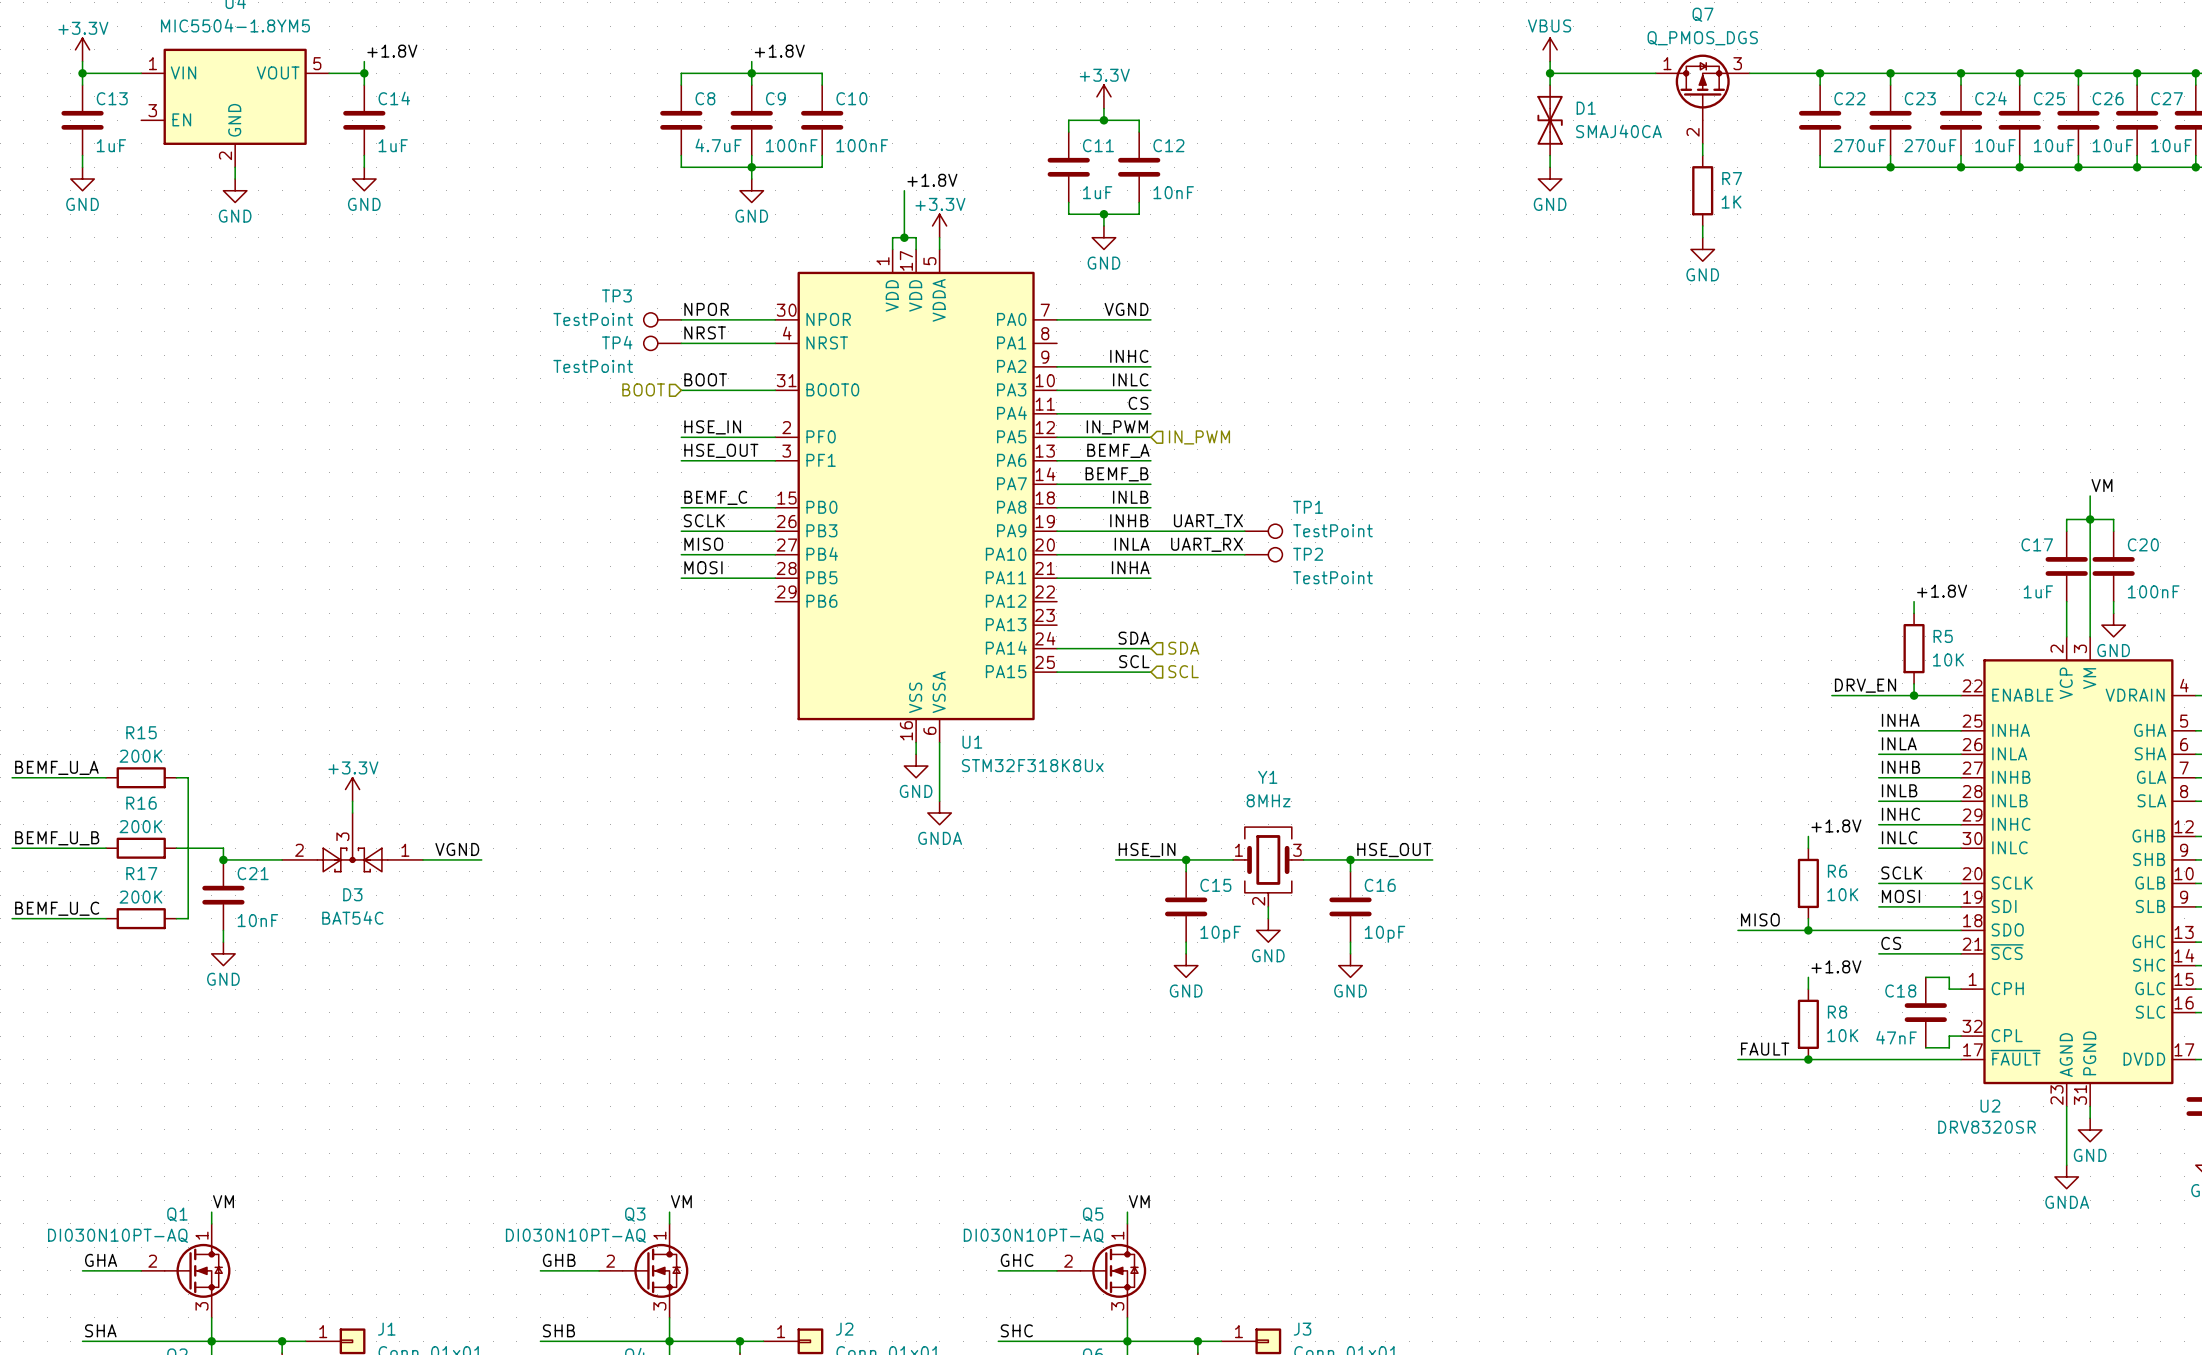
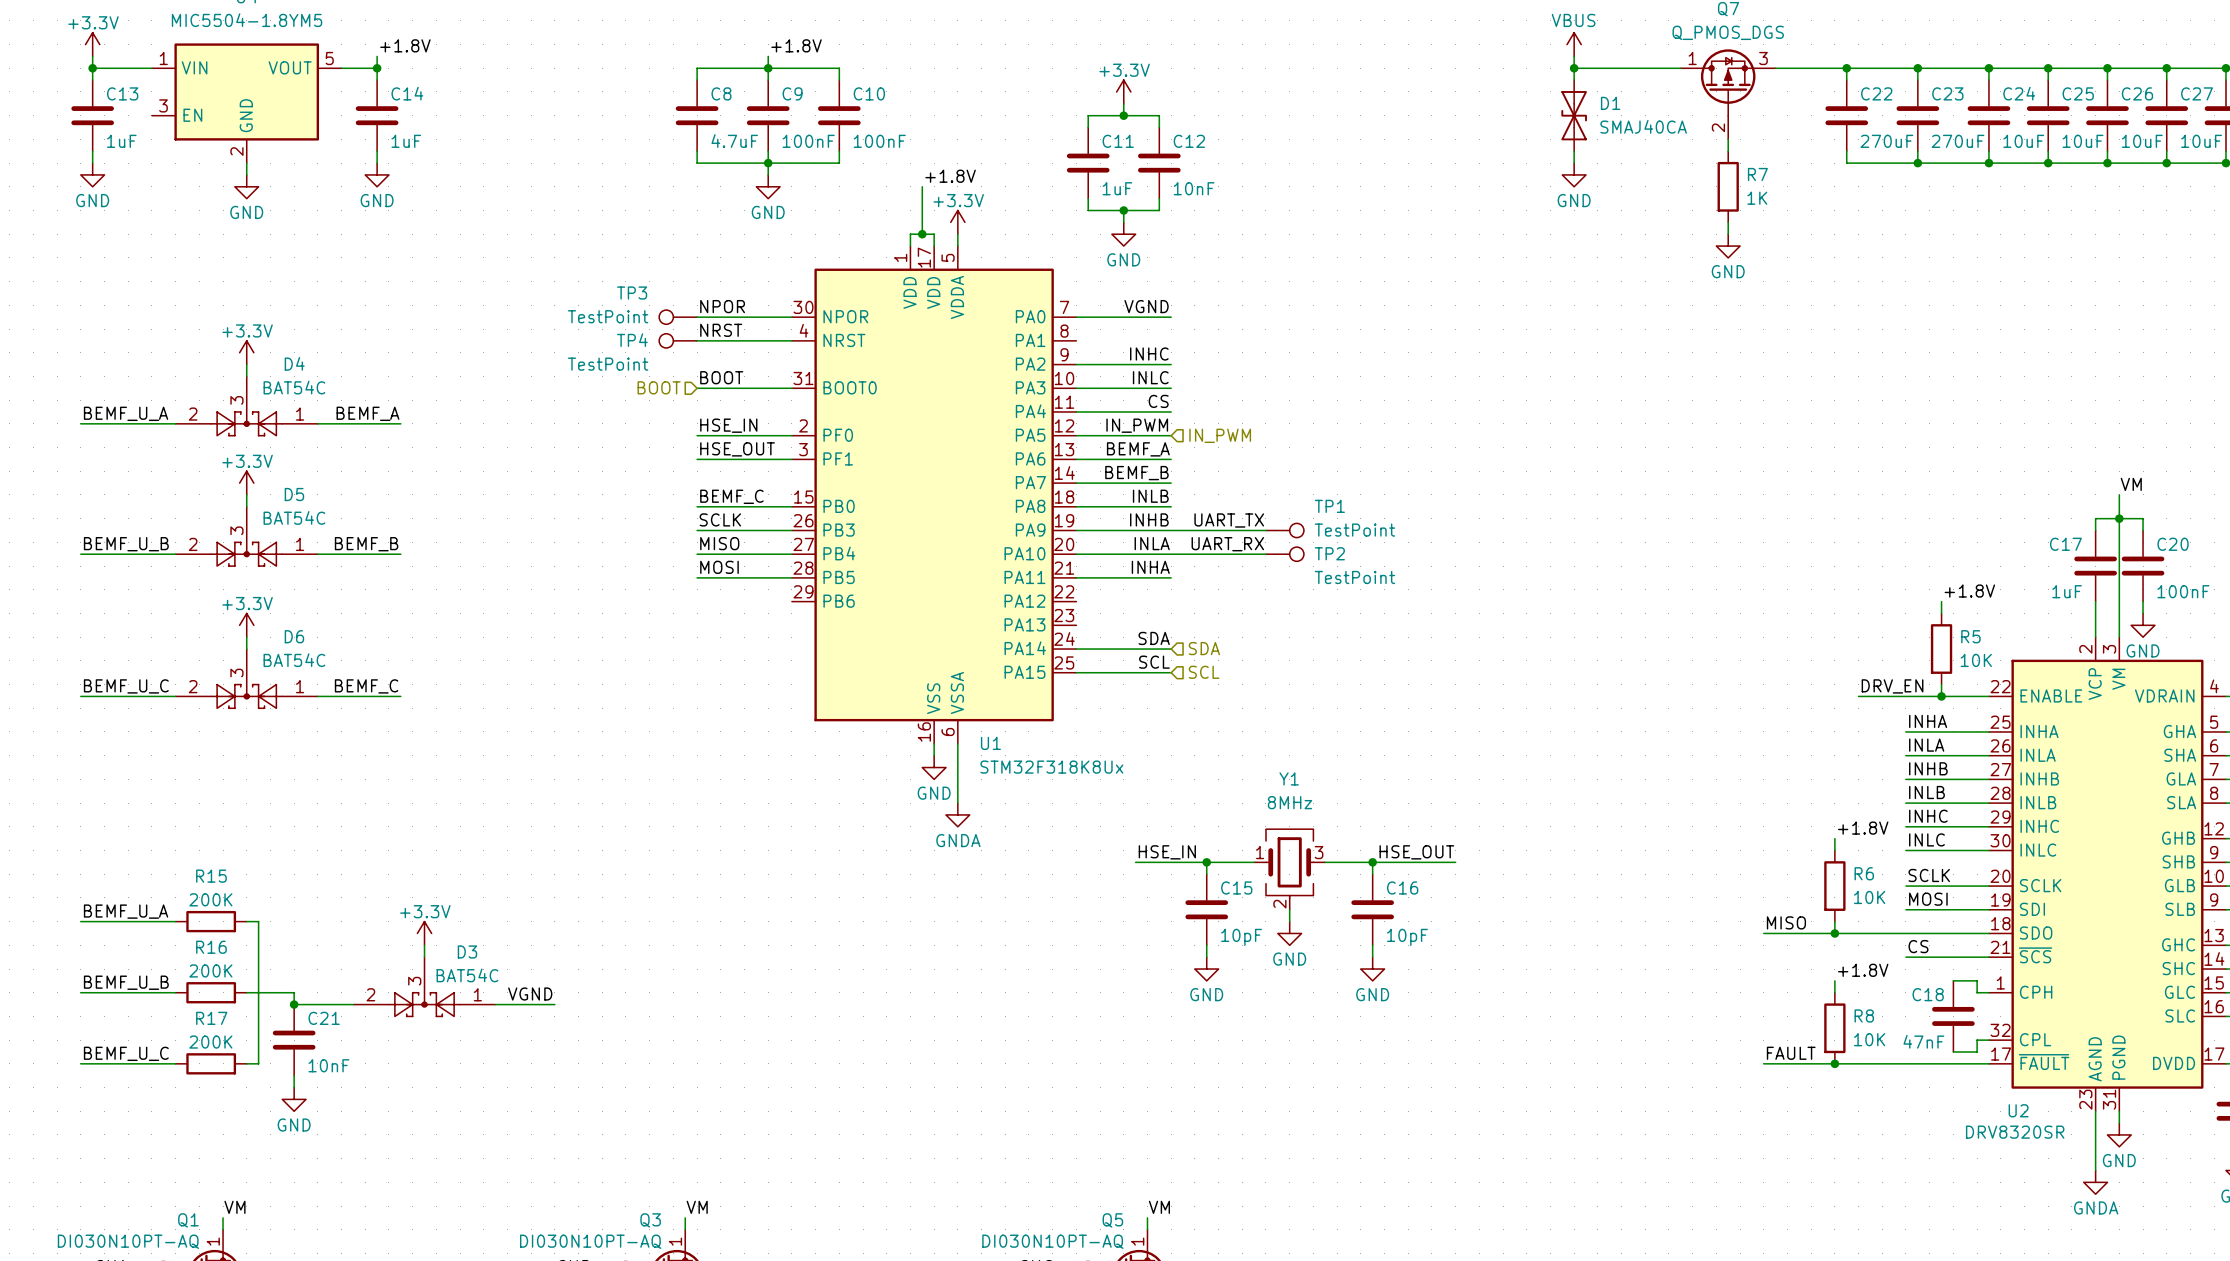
power symbol: none -> +3.3V (246, 352)
wire: none -> (246, 364) (246, 376)
D4: none -> BAT54C (246, 406)
label: none -> BEMF_U_A (126, 413)
label: none -> BEMF_A (367, 413)
wire: none -> (80, 423) (175, 423)
wire: none -> (317, 423) (400, 423)
power symbol: none -> +3.3V (246, 483)
wire: none -> (246, 494) (246, 506)
D5: none -> BAT54C (246, 536)
label: none -> BEMF_U_B (126, 544)
label: none -> BEMF_B (366, 544)
wire: none -> (80, 554) (175, 554)
wire: none -> (317, 554) (400, 554)
power symbol: none -> +3.3V (246, 625)
wire: none -> (246, 637) (246, 649)
D6: none -> BAT54C (246, 678)
label: none -> BEMF_U_C (126, 686)
label: none -> BEMF_C (366, 686)
wire: none -> (317, 696) (400, 696)
label position: BEMF_U_A (56, 767) -> BEMF_U_A (126, 911)
wire: (12, 777) (106, 777) -> (80, 696) (175, 696)
R15 position: (141, 777) -> (211, 921)
wire: (176, 777) (188, 777) (188, 918) (176, 918) -> (246, 921) (258, 921) (258, 1063) (246, 1063)
power symbol: +3.3V (352, 789) -> none
wire: (352, 801) (352, 813) -> (424, 945) (424, 957)
label: BEMF_U_B (57, 838) -> none
D3 position: (352, 842) -> (424, 986)
wire: (12, 848) (106, 848) -> (80, 992) (175, 992)
R16 position: (141, 848) -> (211, 992)
wire: (176, 848) (223, 848) (223, 859) (282, 859) -> (246, 992) (294, 992) (294, 1004) (353, 1004)
label position: VGND (457, 849) -> VGND (530, 994)
junction: (223, 859) -> none
wire: (423, 859) (481, 859) -> (495, 1004) (554, 1004)
D3 name position: D3 (352, 894) -> D3 (467, 951)
C21 position: (223, 895) -> (294, 1040)
label: BEMF_U_C (57, 908) -> none
D3 value position: BAT54C (352, 917) -> BAT54C (467, 975)
wire: (12, 918) (70, 918) -> (116, 921) (175, 921)
R17 position: (141, 918) -> (211, 1063)
wire: (223, 930) (223, 942) -> (294, 1075) (294, 1087)
power symbol: none -> +3.3V (424, 933)
power symbol position: GND (223, 953) -> GND (294, 1099)
label: none -> BEMF_U_B (126, 982)
junction: none -> (294, 1004)
label: none -> BEMF_U_C (126, 1053)
wire: none -> (80, 1063) (175, 1063)

